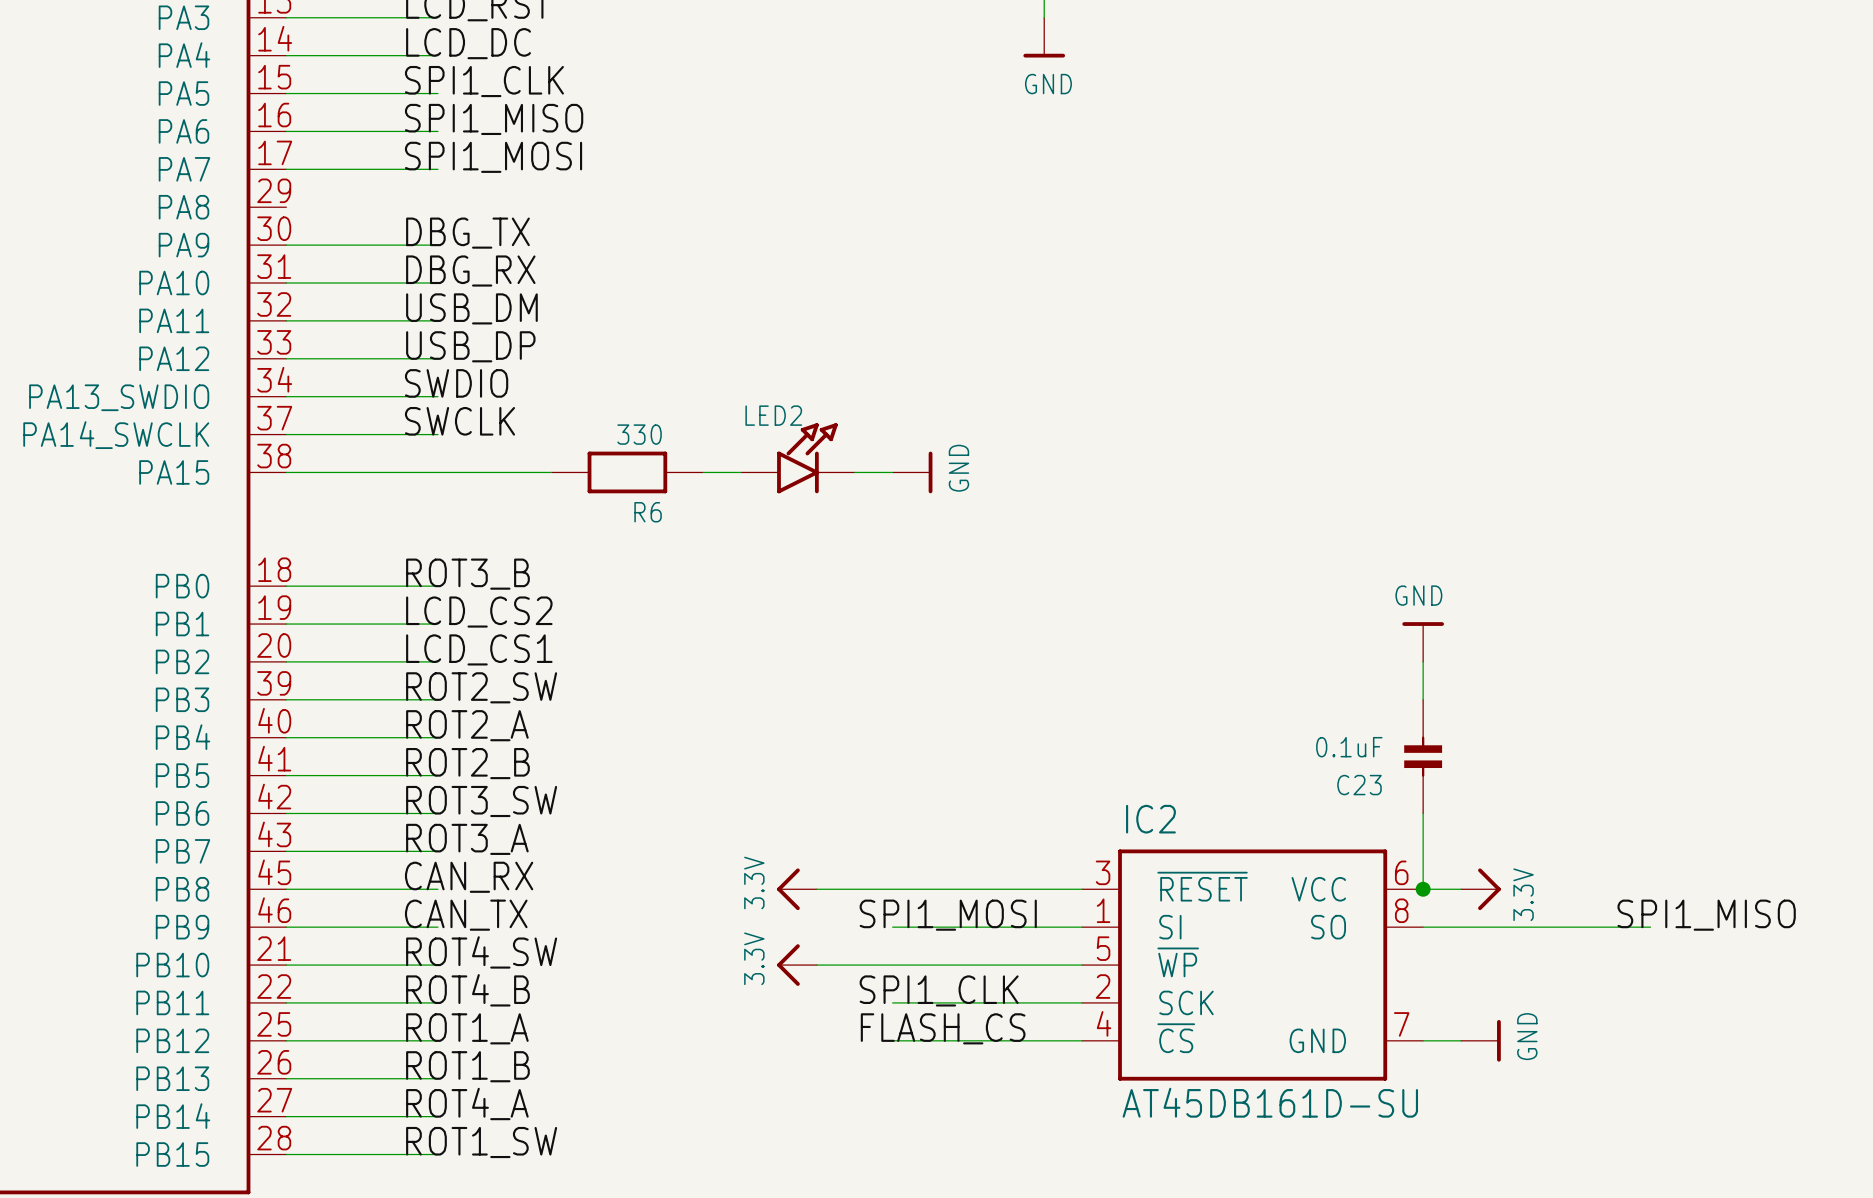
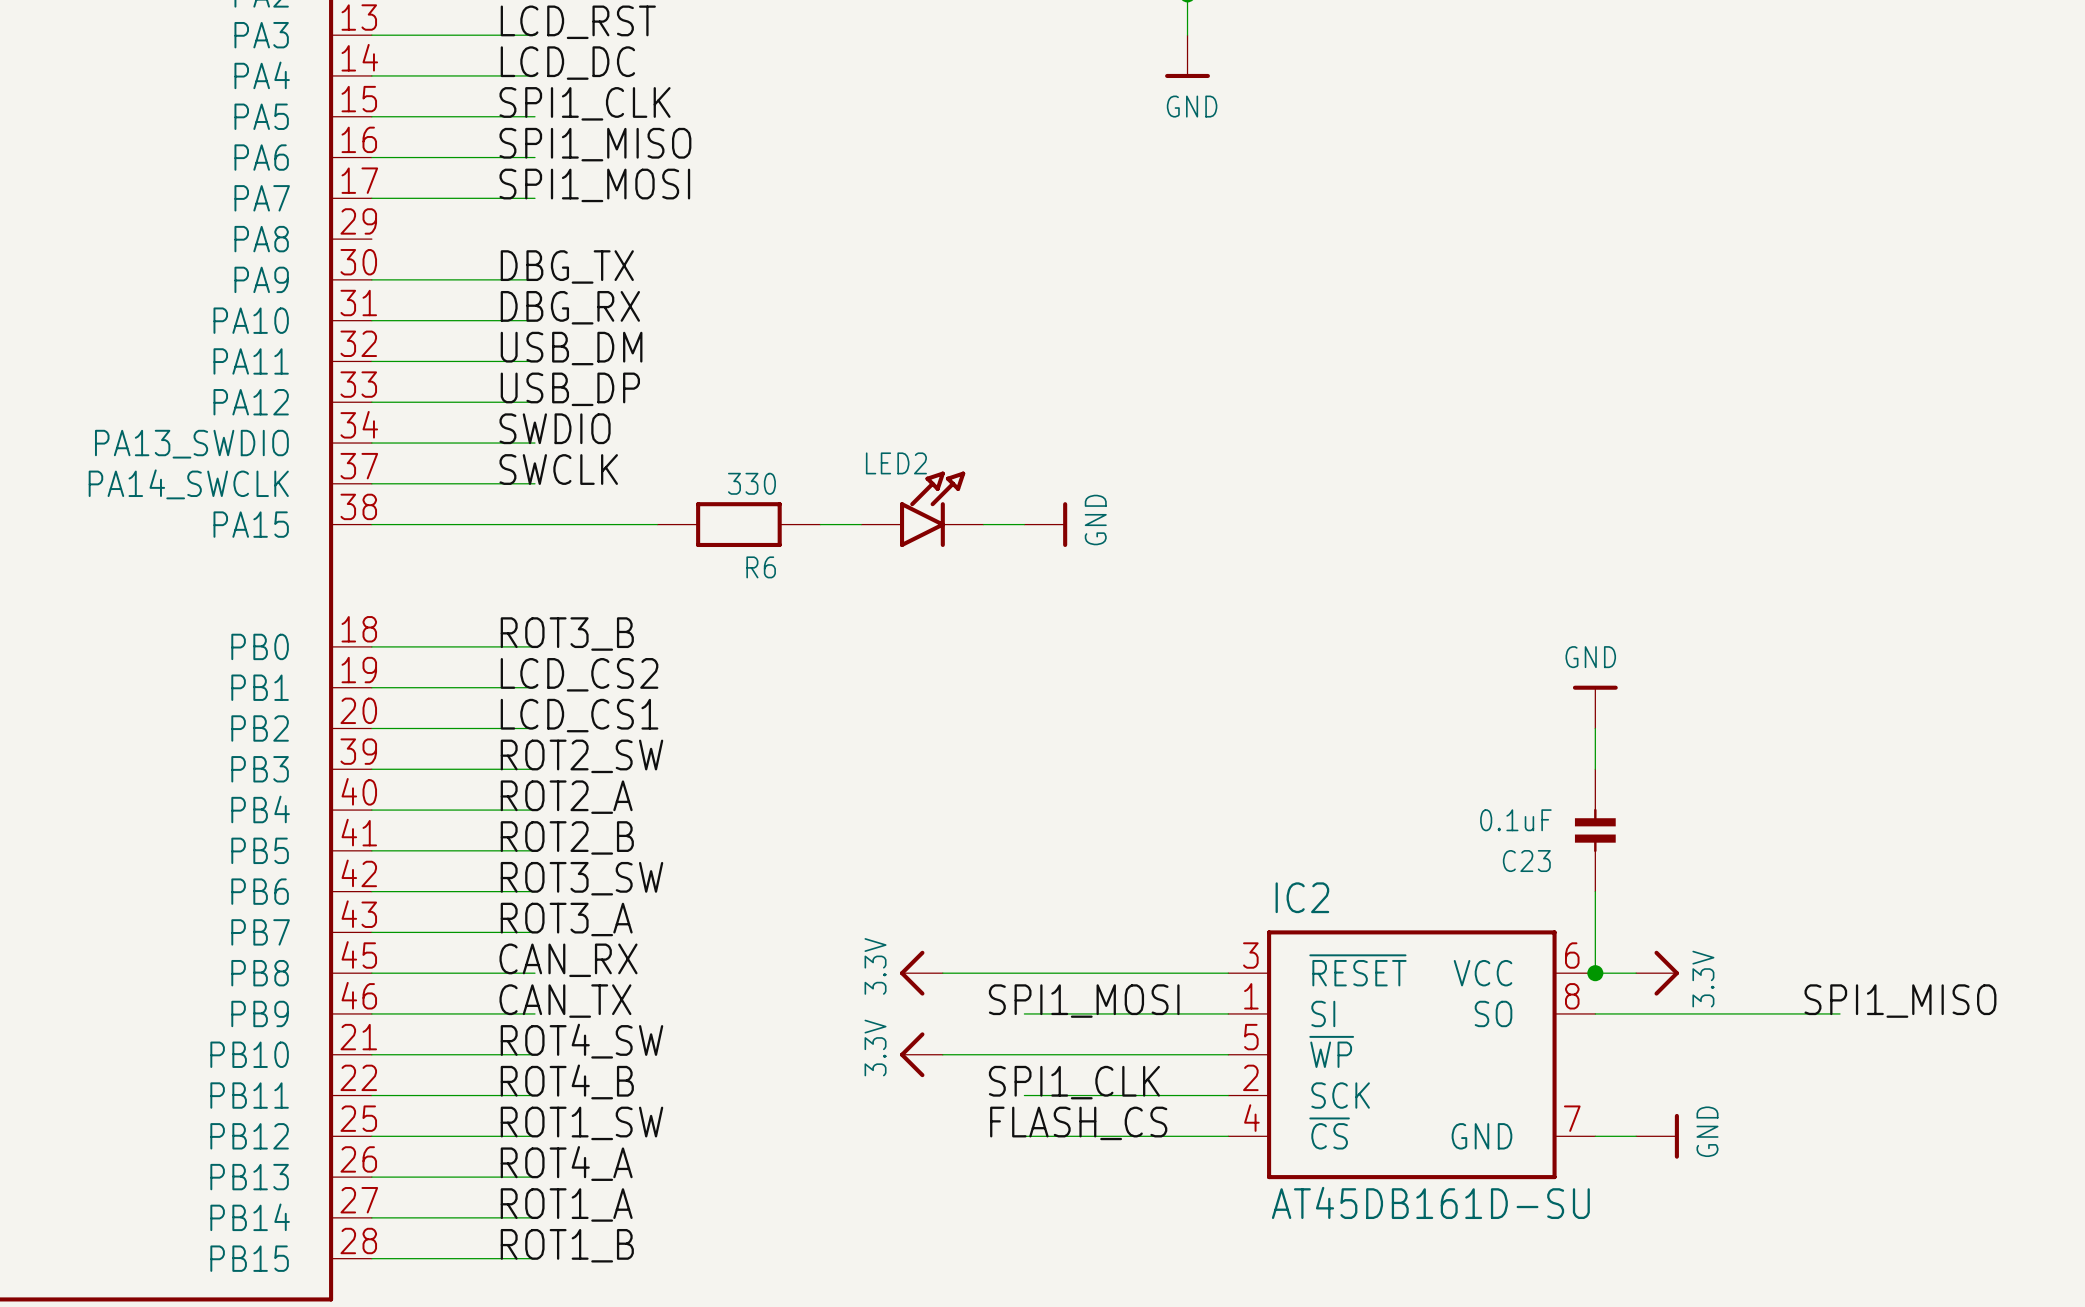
label: ROT1_A (467, 1028) -> ROT1_SW (581, 1123)
label: ROT1_B (467, 1066) -> ROT4_A (566, 1163)
label: ROT4_A (467, 1103) -> ROT1_A (566, 1204)
label: ROT1_SW (481, 1142) -> ROT1_B (567, 1245)

